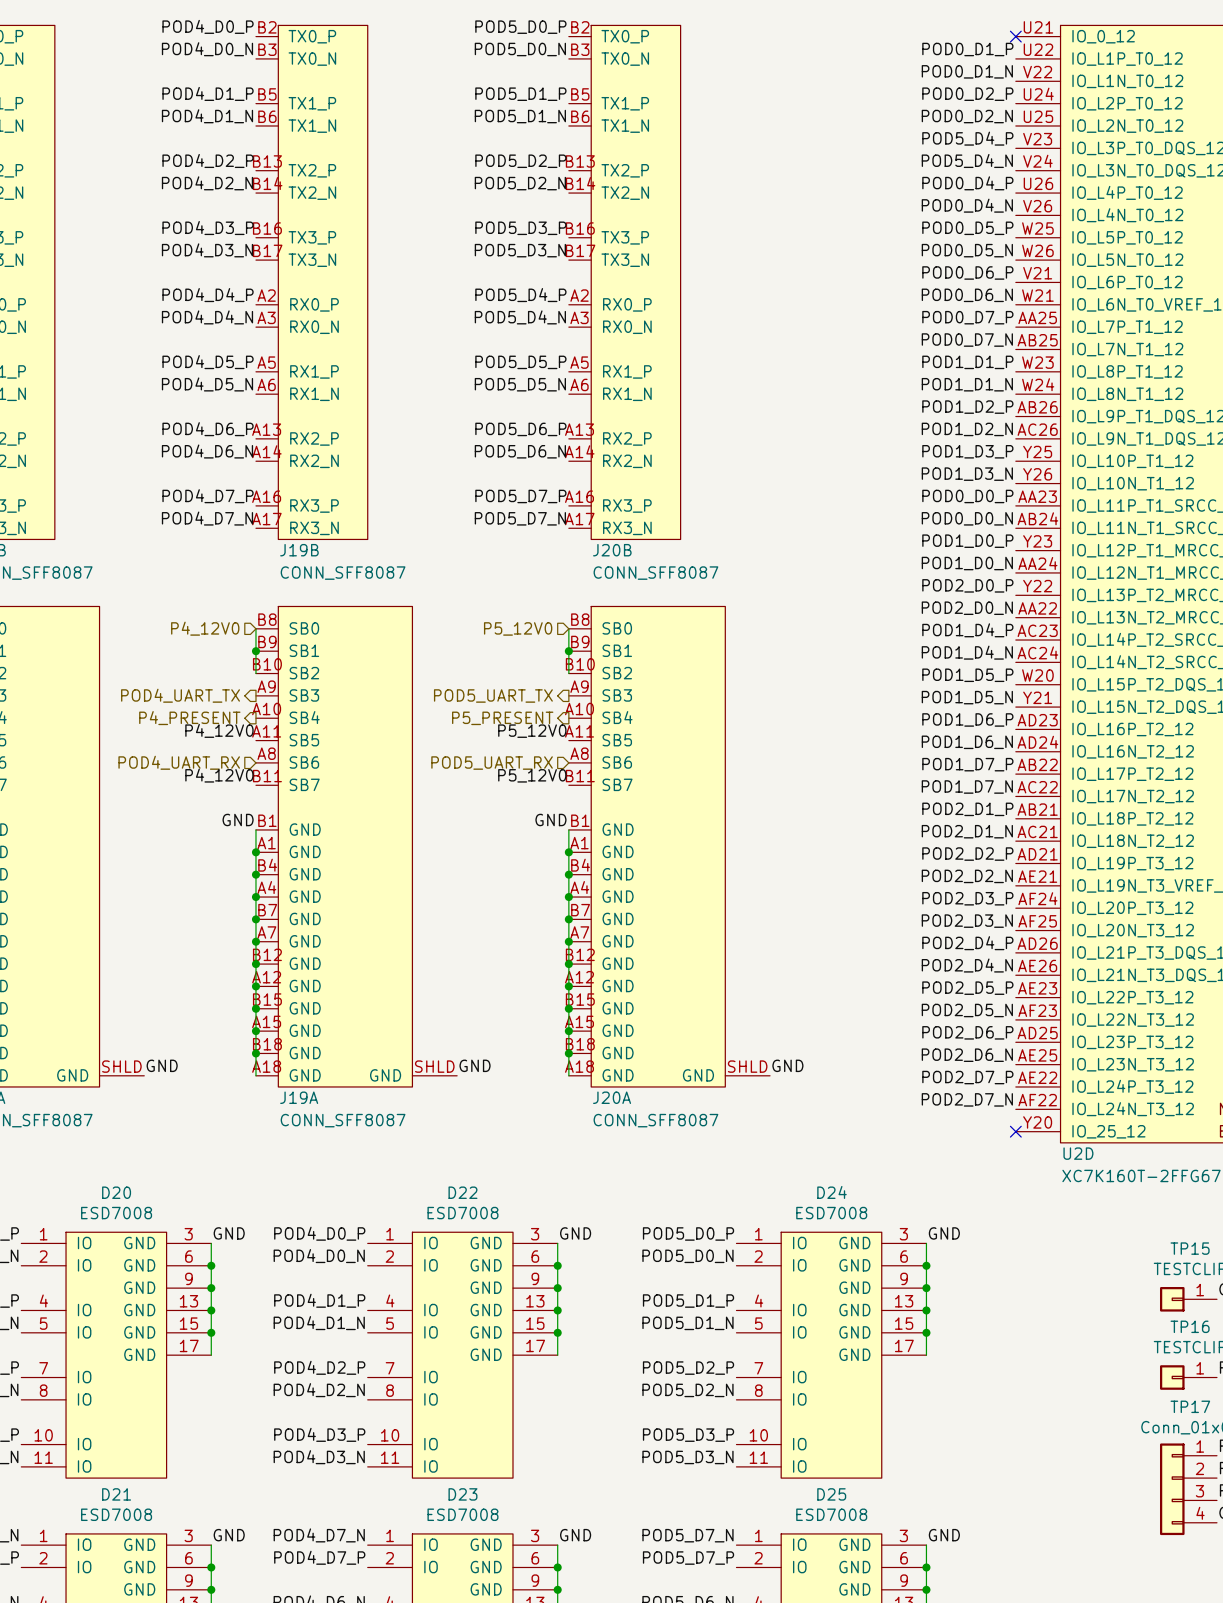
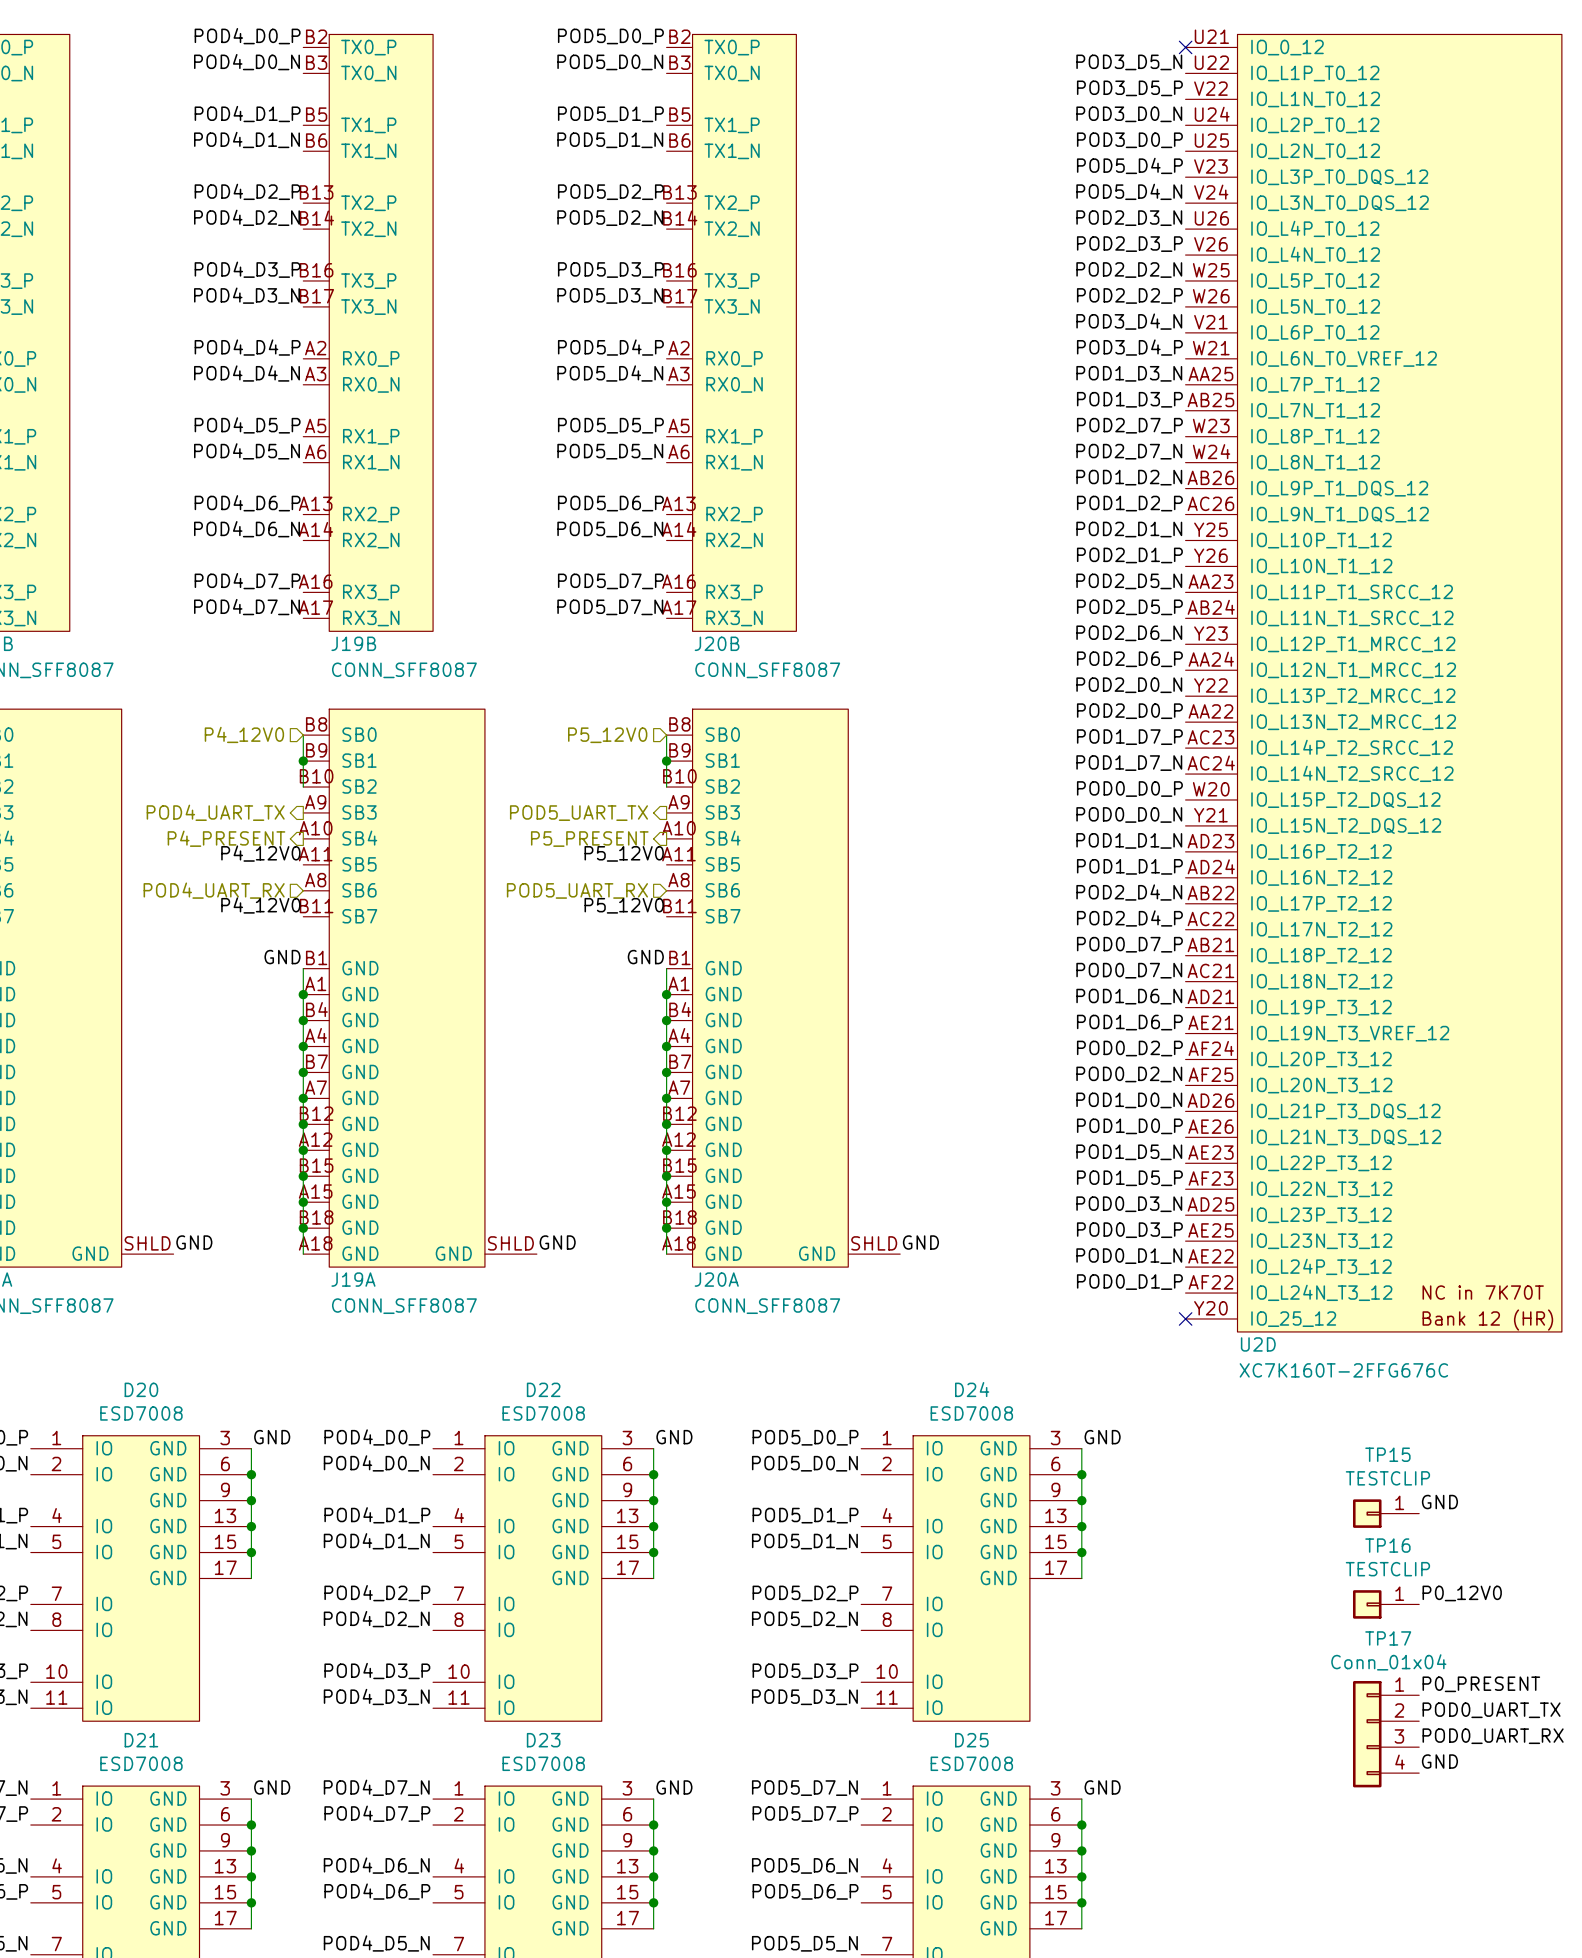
label: POD0_D1_P (967, 49) -> POD3_D5_N (1129, 62)
label: POD0_D1_N (967, 71) -> POD3_D5_P (1129, 88)
label: POD0_D2_P (967, 94) -> POD3_D0_N (1129, 114)
label: POD0_D2_N (967, 116) -> POD3_D0_P (1129, 140)
label: POD0_D4_P (967, 183) -> POD2_D3_N (1129, 218)
label: POD0_D4_N (967, 205) -> POD2_D3_P (1129, 244)
label: POD0_D5_P (967, 228) -> POD2_D2_N (1129, 270)
label: POD0_D5_N (967, 250) -> POD2_D2_P (1129, 295)
label: POD0_D6_P (967, 272) -> POD3_D4_N (1129, 321)
label: POD0_D6_N (967, 295) -> POD3_D4_P (1129, 347)
label: POD0_D7_P (967, 317) -> POD1_D3_N (1129, 373)
label: POD0_D7_N (967, 340) -> POD1_D3_P (1129, 399)
label: POD1_D1_P (967, 362) -> POD2_D7_P (1129, 425)
label: POD1_D1_N (967, 384) -> POD2_D7_N (1129, 451)
label: POD1_D2_P (967, 407) -> POD1_D2_N (1129, 477)
label: POD1_D2_N (967, 429) -> POD1_D2_P (1129, 503)
label: POD1_D3_P (967, 451) -> POD2_D1_N (1129, 529)
label: POD1_D3_N (967, 474) -> POD2_D1_P (1129, 555)
label: POD0_D0_P (967, 496) -> POD2_D5_N (1129, 581)
label: POD0_D0_N (967, 518) -> POD2_D5_P (1129, 607)
label: POD1_D0_P (967, 541) -> POD2_D6_N (1129, 633)
label: POD1_D0_N (967, 563) -> POD2_D6_P (1129, 659)
label: POD2_D0_P (967, 585) -> POD2_D0_N (1129, 685)
label: POD2_D0_N (967, 608) -> POD2_D0_P (1129, 711)
label: POD1_D4_P (967, 630) -> POD1_D7_P (1129, 737)
label: POD1_D4_N (967, 652) -> POD1_D7_N (1129, 763)
label: POD1_D5_P (967, 675) -> POD0_D0_P (1129, 789)
label: POD1_D5_N (967, 697) -> POD0_D0_N (1129, 814)
label: POD1_D6_P (967, 719) -> POD1_D1_N (1129, 840)
label: POD1_D6_N (967, 742) -> POD1_D1_P (1129, 866)
label: POD1_D7_P (967, 764) -> POD2_D4_N (1129, 892)
label: POD1_D7_N (967, 787) -> POD2_D4_P (1129, 918)
label: POD2_D1_P (967, 809) -> POD0_D7_P (1129, 944)
label: POD2_D1_N (967, 831) -> POD0_D7_N (1129, 970)
label: POD2_D2_P (967, 854) -> POD1_D6_N (1129, 996)
label: POD2_D2_N (967, 876) -> POD1_D6_P (1129, 1022)
label: POD2_D3_P (967, 898) -> POD0_D2_P (1129, 1048)
label: POD2_D3_N (967, 921) -> POD0_D2_N (1129, 1074)
label: POD2_D4_P (967, 943) -> POD1_D0_N (1129, 1100)
label: POD2_D4_N (967, 965) -> POD1_D0_P (1129, 1126)
label: POD2_D5_P (967, 988) -> POD1_D5_N (1129, 1152)
label: POD2_D5_N (967, 1010) -> POD1_D5_P (1129, 1178)
label: POD2_D6_P (967, 1032) -> POD0_D3_N (1129, 1204)
label: POD2_D6_N (967, 1055) -> POD0_D3_P (1129, 1230)
label: POD2_D7_P (967, 1077) -> POD0_D1_N (1129, 1256)
label: POD2_D7_N (967, 1099) -> POD0_D1_P (1129, 1282)

